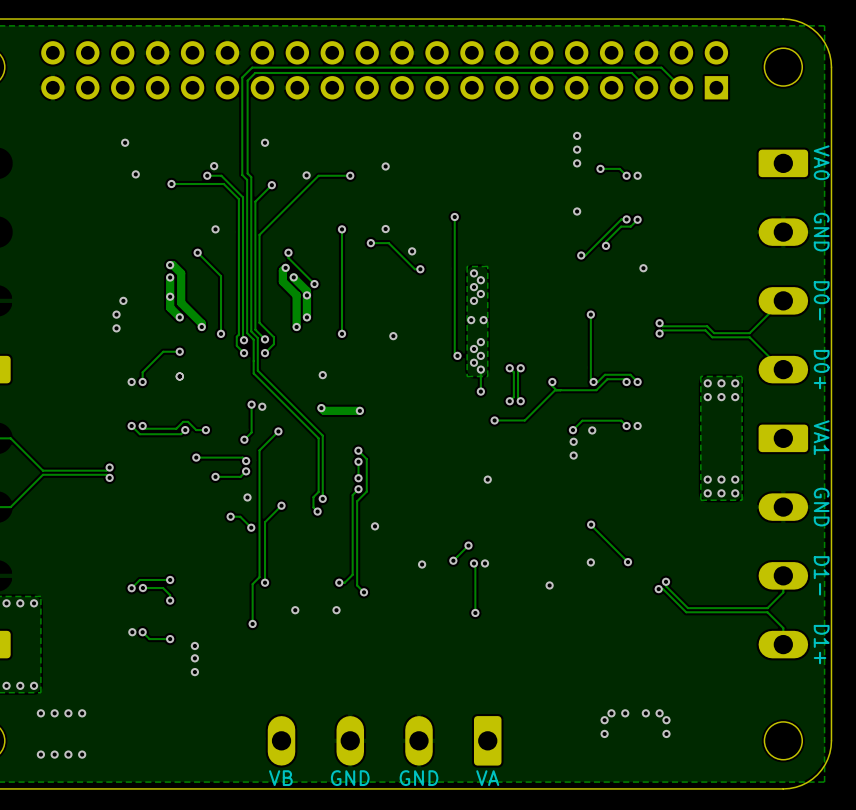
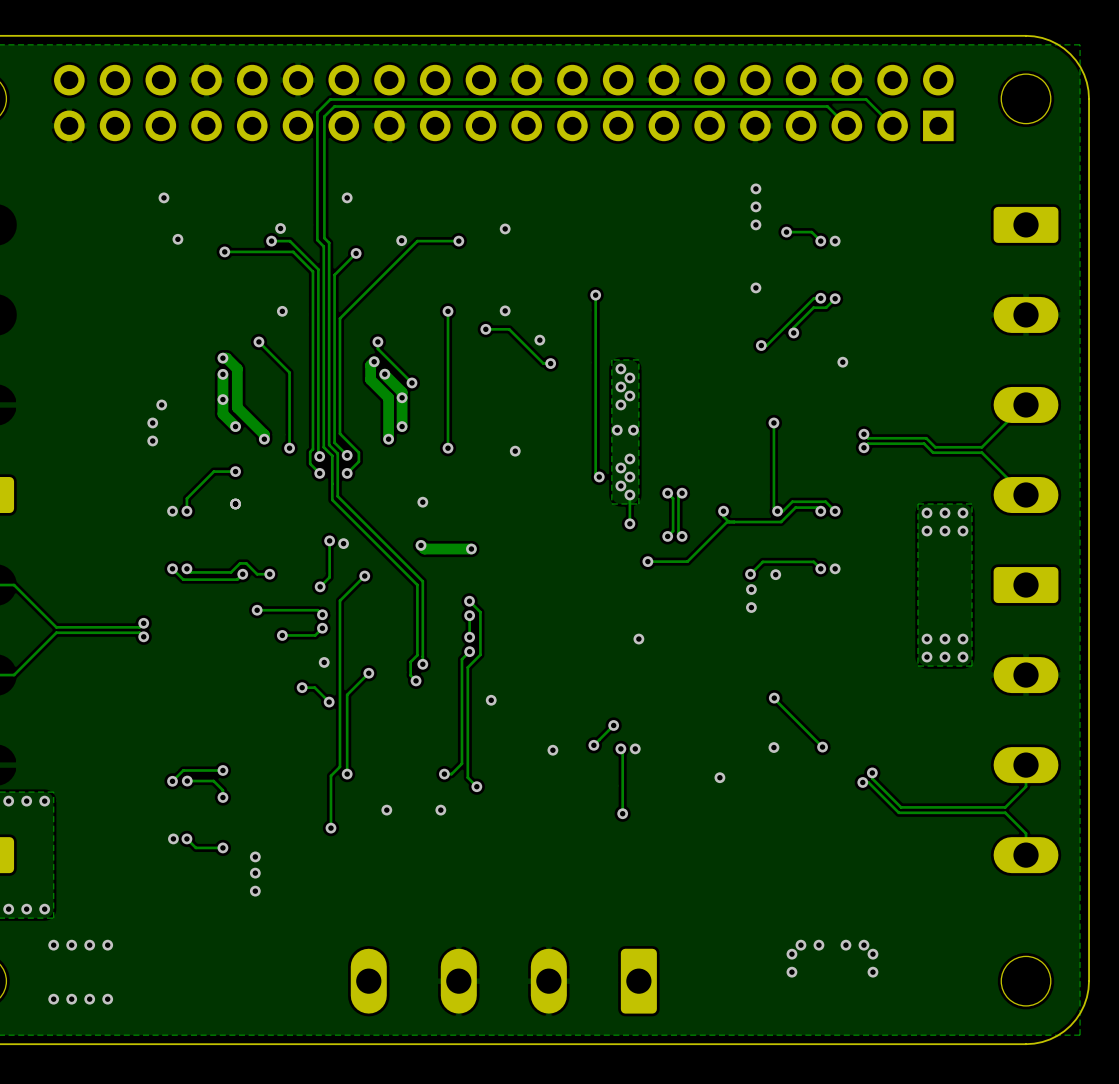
text: VA0 (821, 162) -> none
text: GND (821, 232) -> none
text: D0- (821, 300) -> none
text: D0+ (821, 369) -> none
text: VA1 (821, 437) -> none
text: GND (821, 507) -> none
text: D1- (821, 575) -> none
text: D1+ (821, 644) -> none
text: VB (280, 778) -> none
text: GND (350, 778) -> none
text: GND (419, 778) -> none
text: VA (487, 778) -> none

